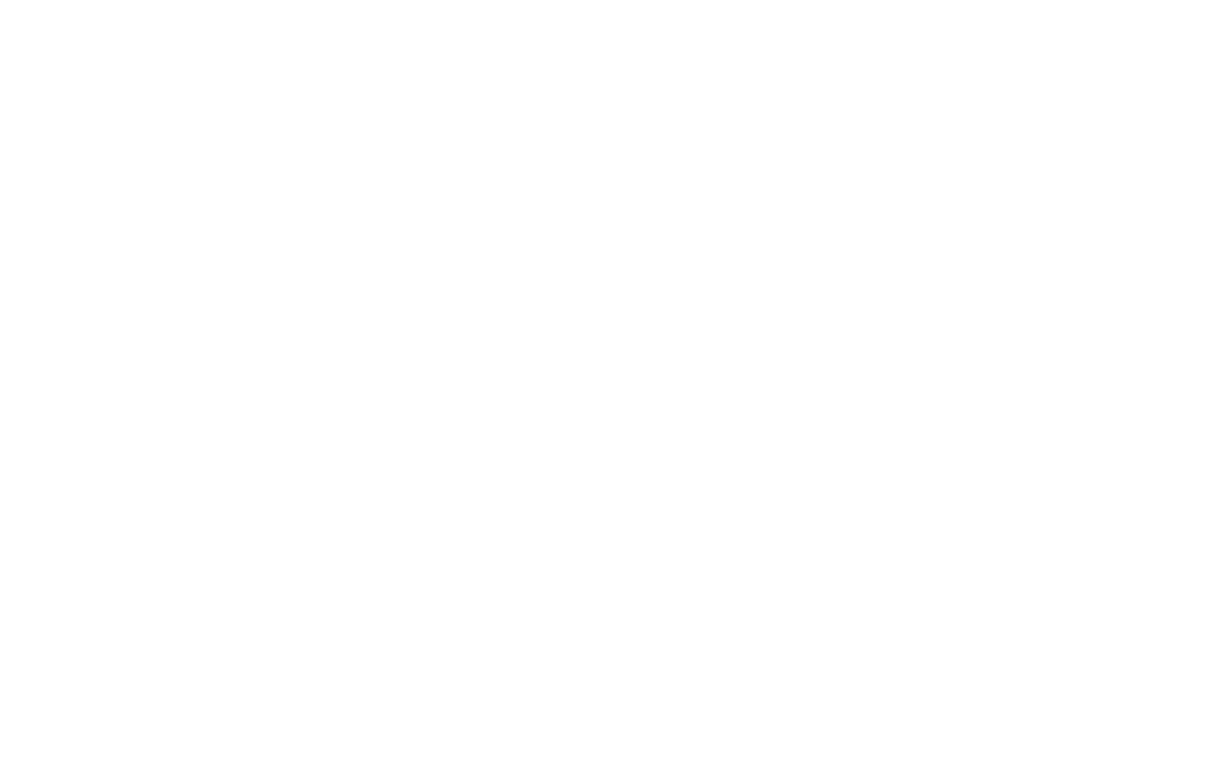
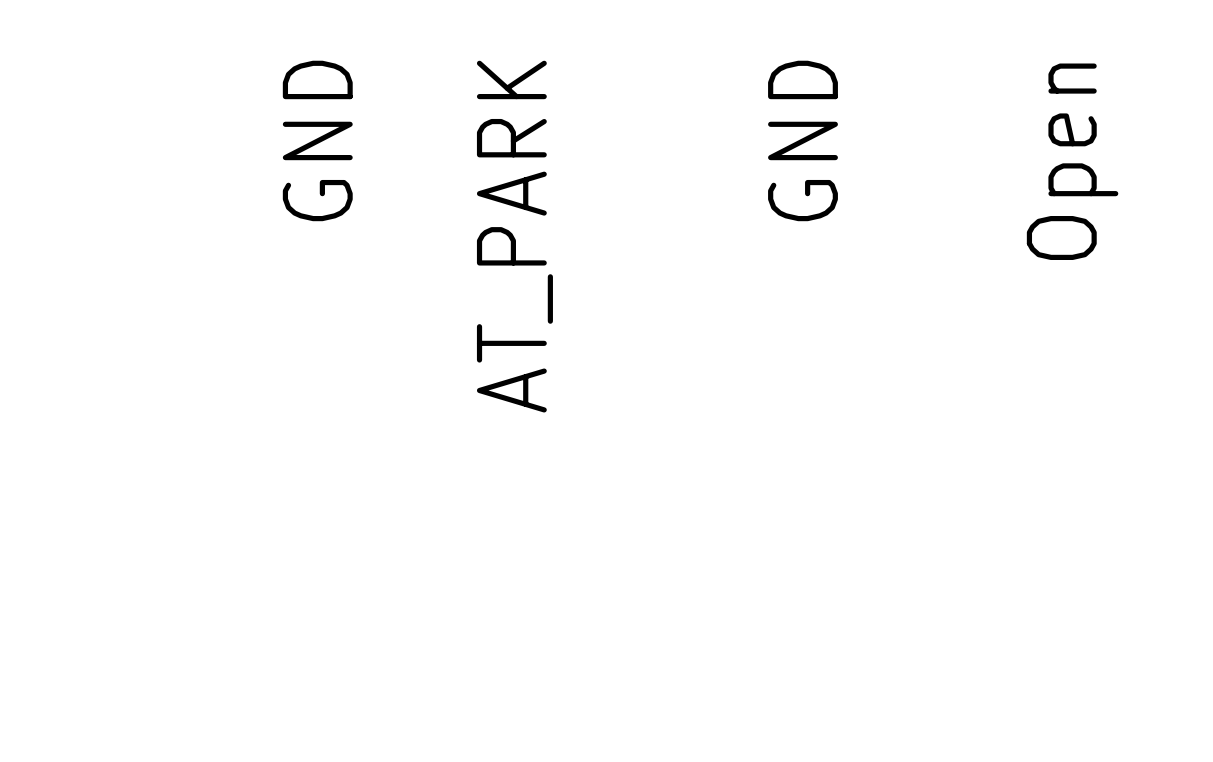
text: none -> GND (317, 140)
text: none -> GND (803, 140)
text: none -> Open (1072, 161)
text: none -> AT_PARK (514, 236)

